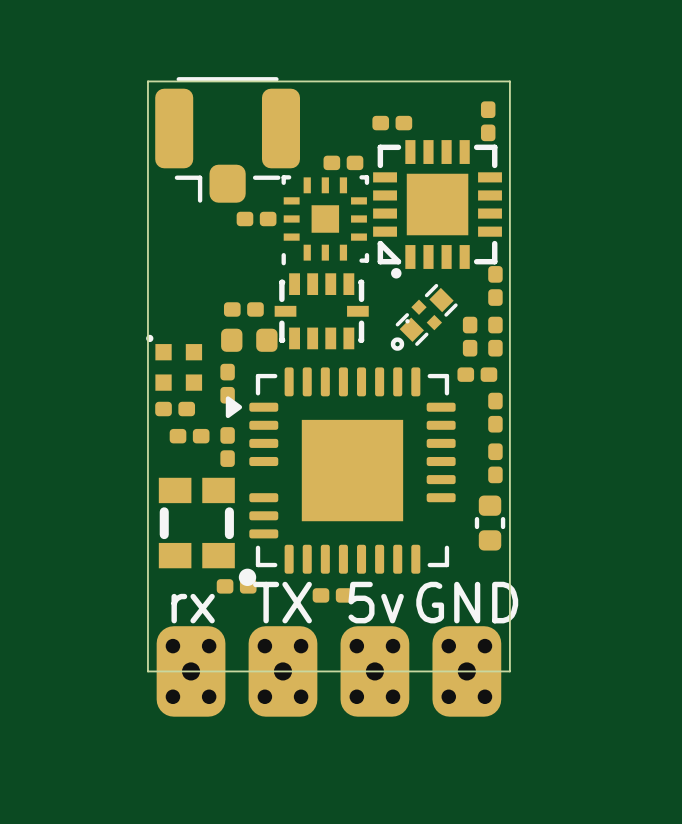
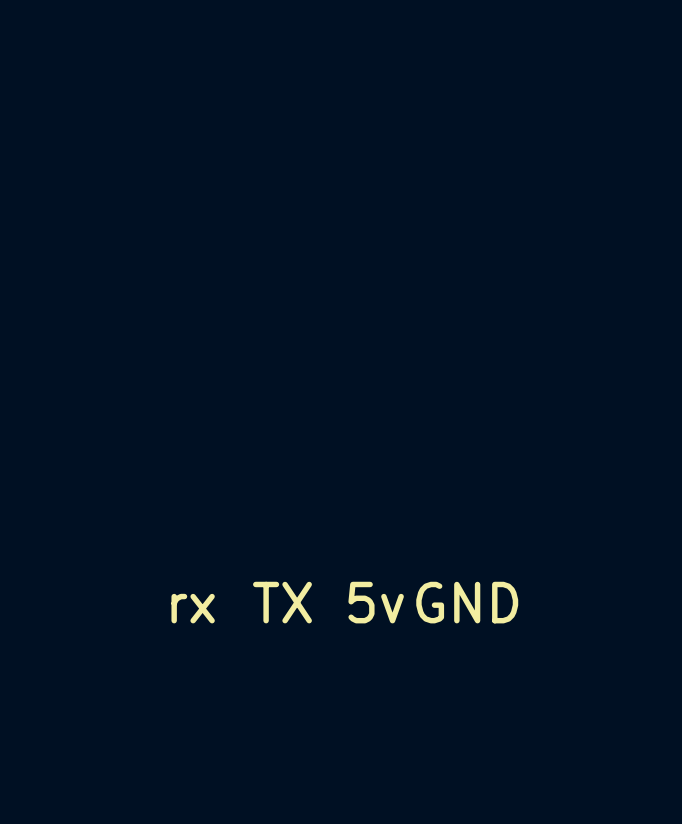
board edge: (147, 81) (509, 81) (509, 671) (147, 671) (147, 81) -> none
part: (488, 121) -> none
part: (392, 123) -> none
part: (227, 139) -> none
part: (343, 162) -> none
part: (437, 209) -> none
part: (256, 218) -> none
part: (325, 220) -> none
part: (495, 285) -> none
part: (243, 309) -> none
part: (321, 311) -> none
part: (424, 317) -> none
part: (470, 336) -> none
part: (495, 336) -> none
part: (249, 340) -> none
part: (174, 362) -> none
part: (477, 374) -> none
part: (227, 383) -> none
part: (175, 409) -> none
part: (495, 412) -> none
part: (189, 436) -> none
part: (227, 447) -> none
part: (495, 463) -> none
part: (340, 470) -> none
part: (490, 523) -> none
part: (207, 531) -> none
part: (236, 586) -> none
part: (332, 595) -> none
part: (191, 671) -> none
part: (282, 671) -> none
part: (374, 671) -> none
part: (466, 671) -> none

